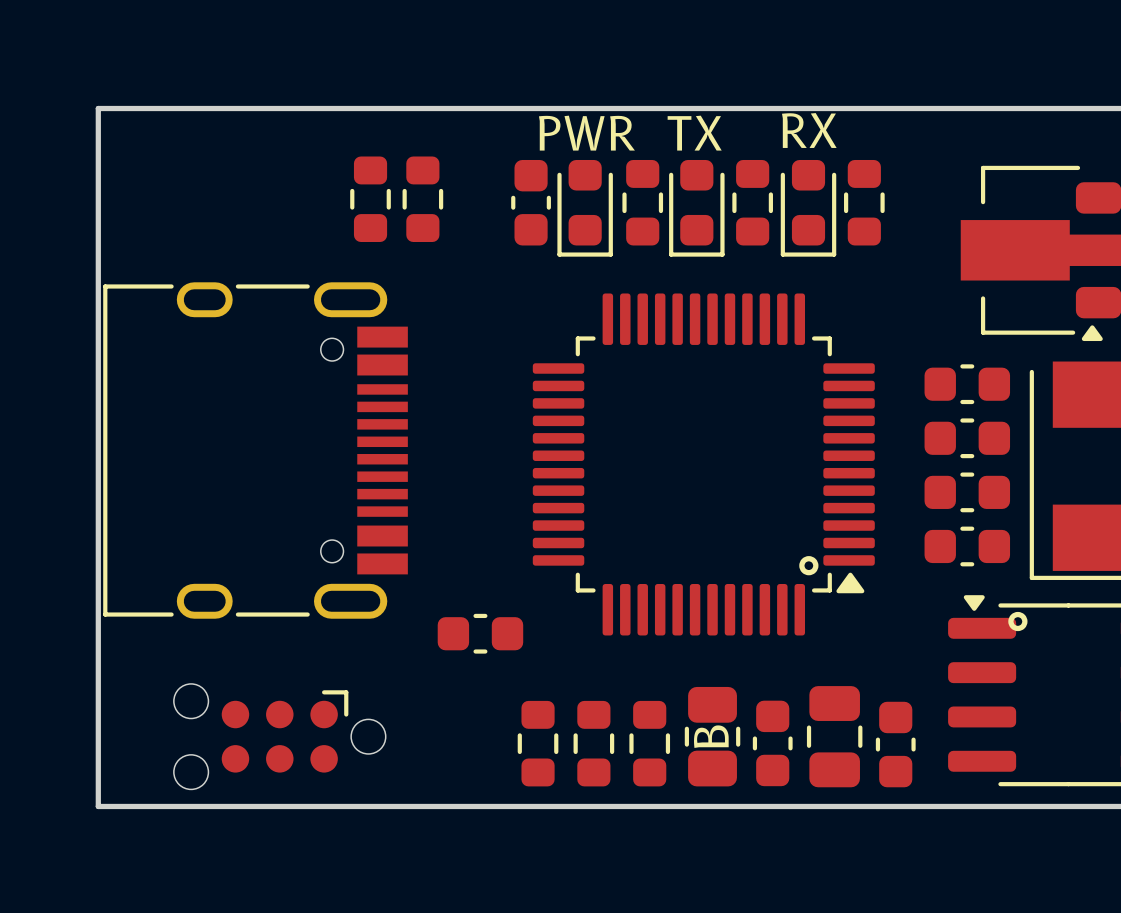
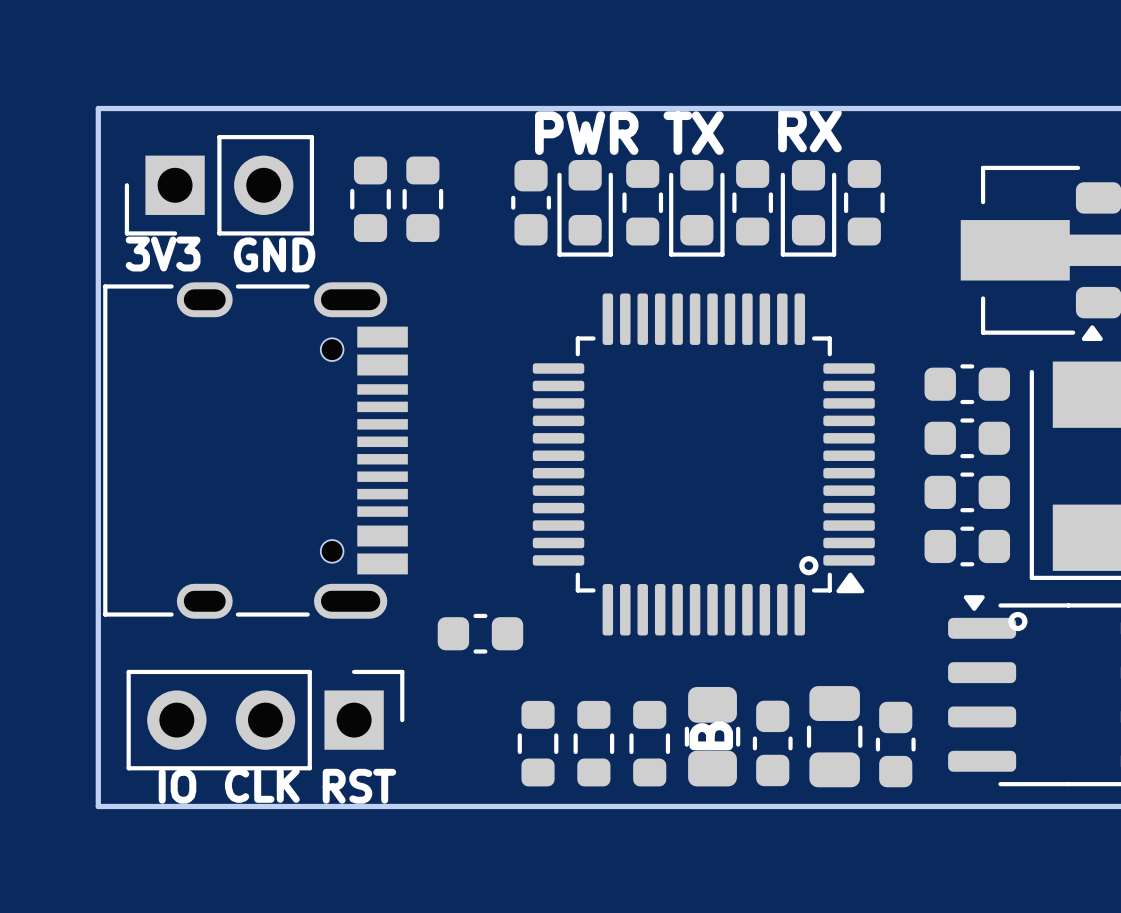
part: none -> (219, 185)
text: none -> 3V3 (163, 254)
text: none -> GND (274, 254)
part footprint: [173, 683, 386, 790] -> [126, 669, 405, 771]
text: none -> CLK (262, 785)
text: none -> IO (177, 786)
text: none -> RST (359, 786)

